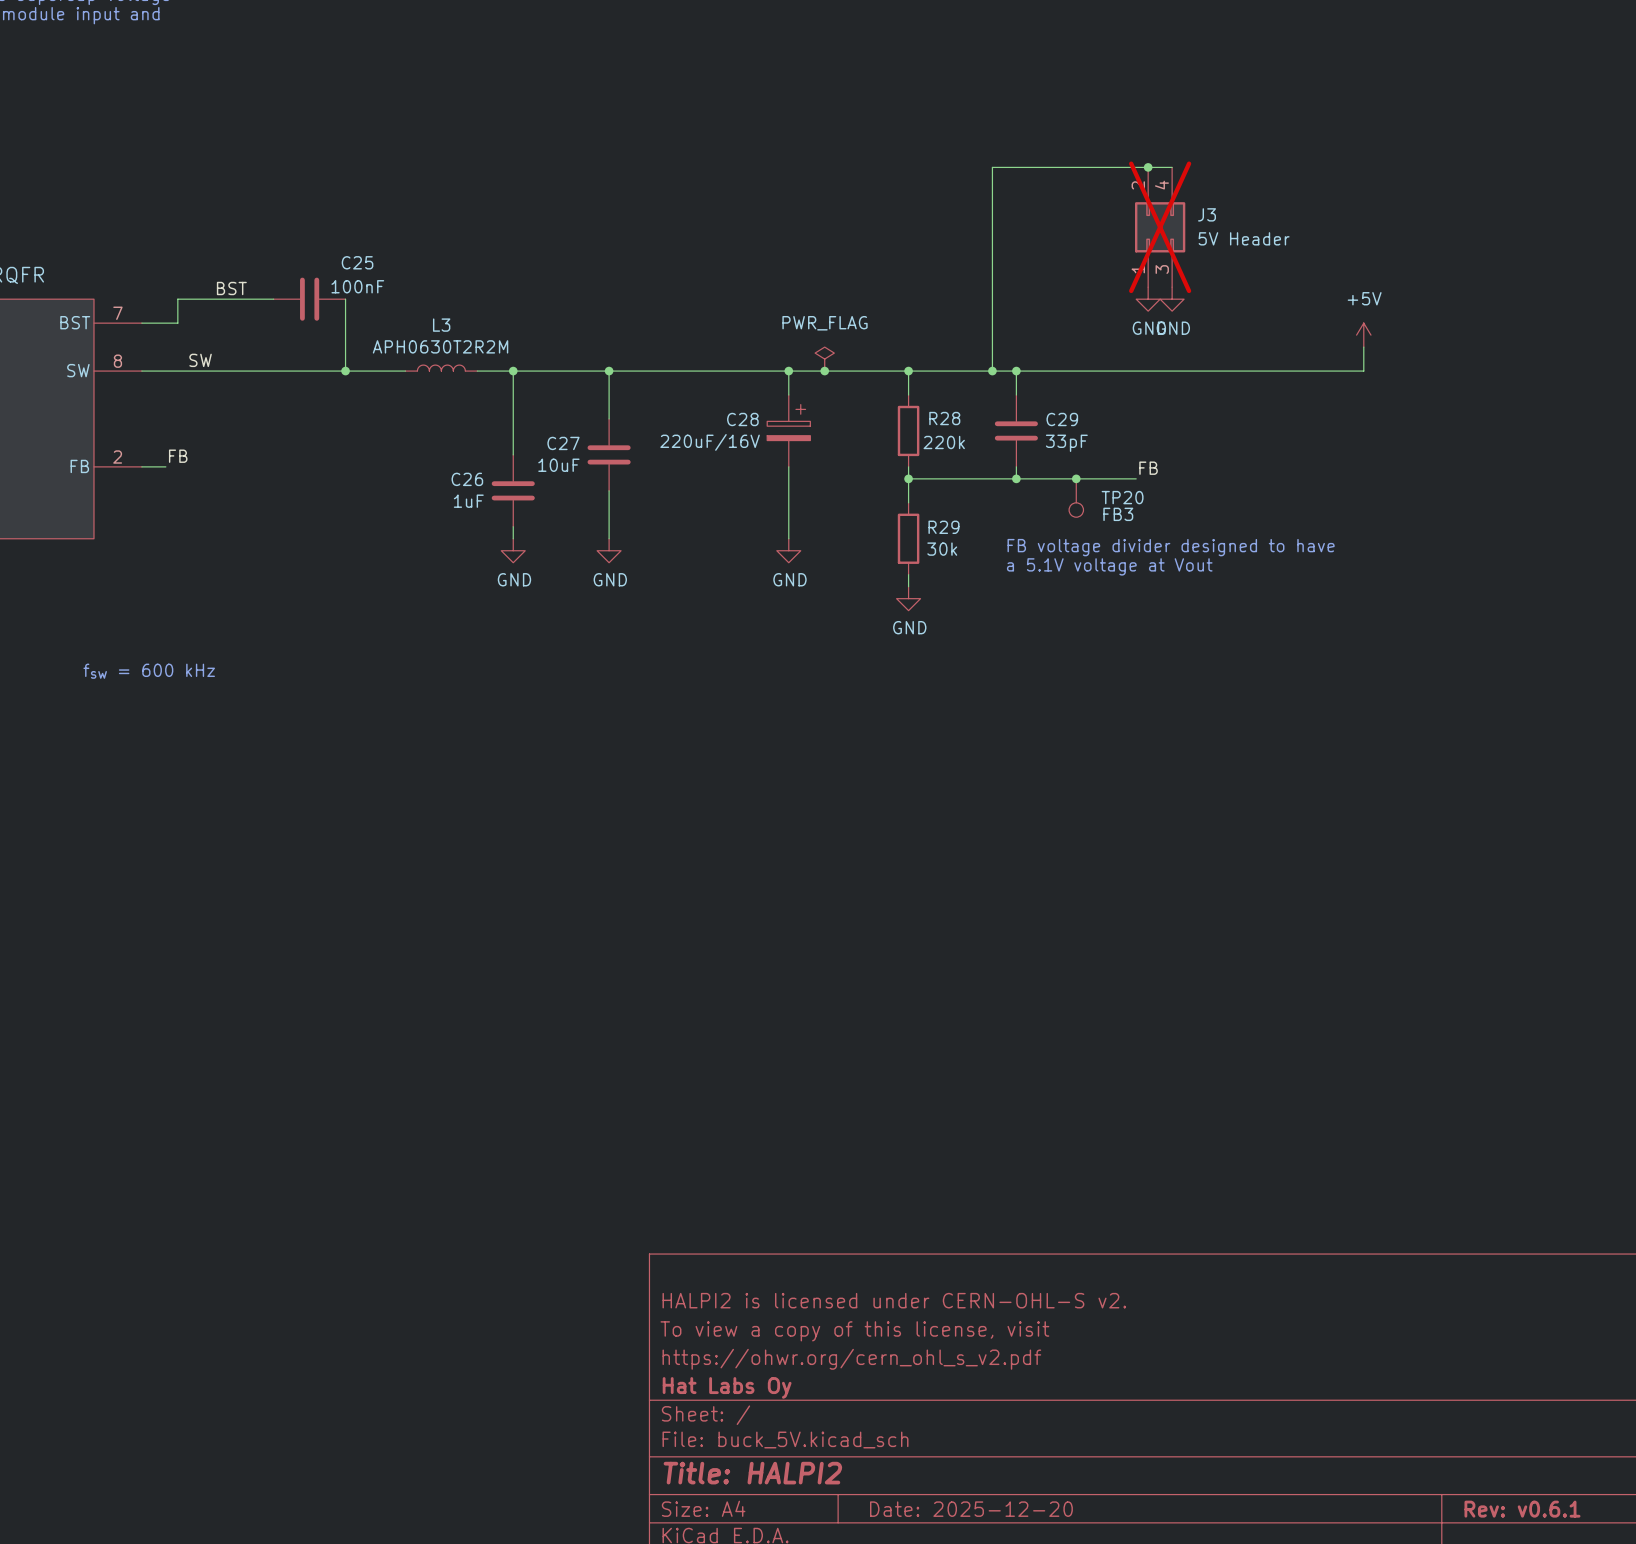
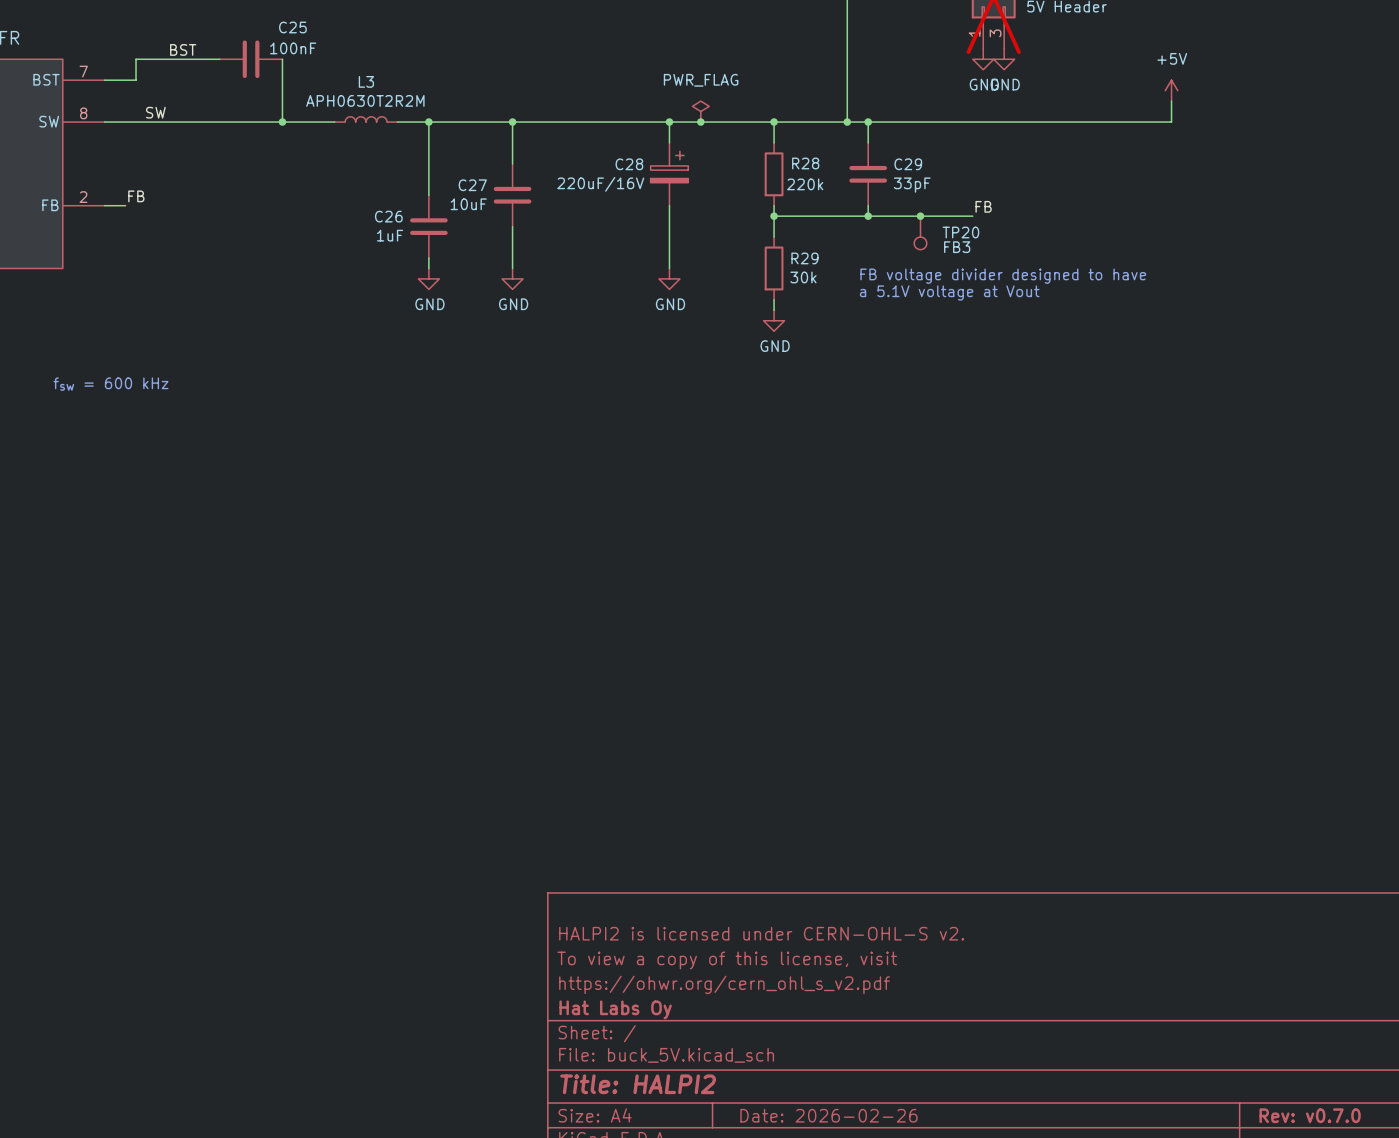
title block: Date: 2025-12-20 (971, 1509) -> Date: 2026-02-26 (828, 1115)
title block: Rev: v0.6.1 (1522, 1509) -> Rev: v0.7.0 (1310, 1115)

